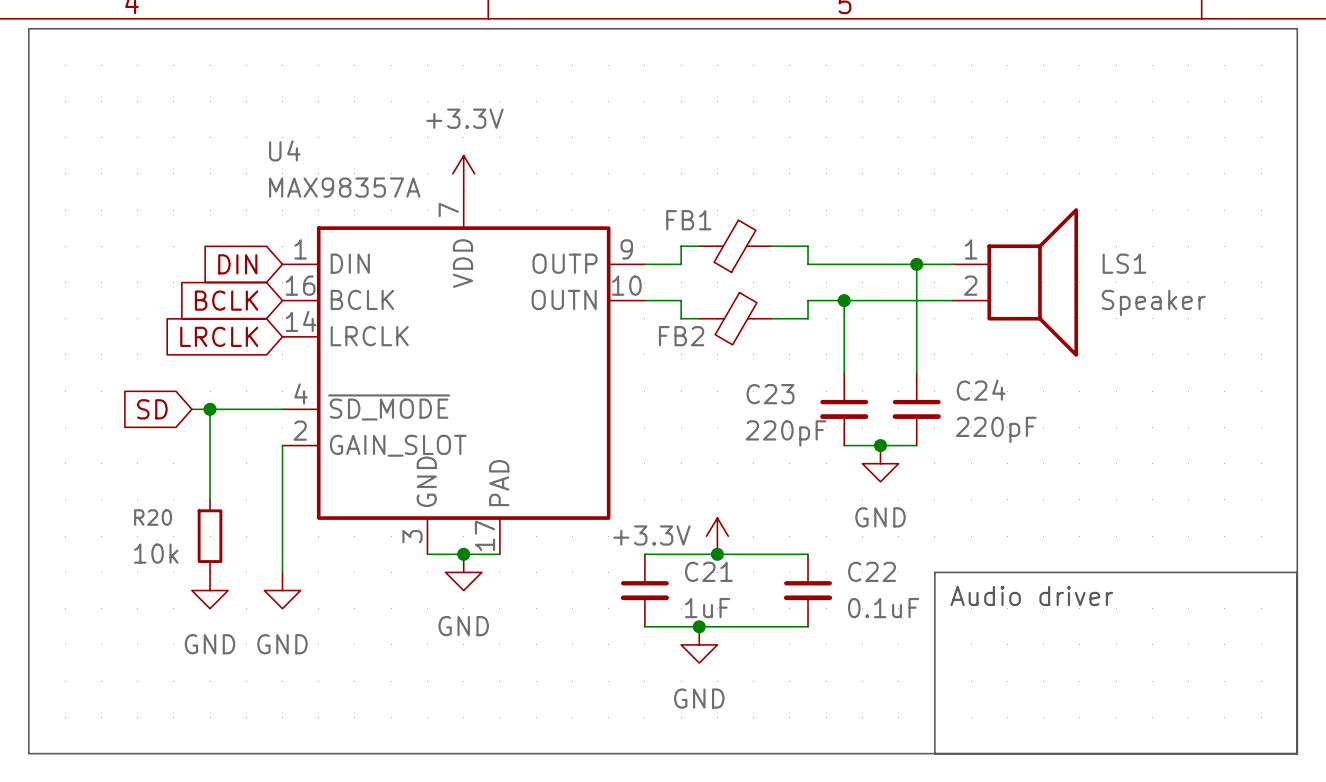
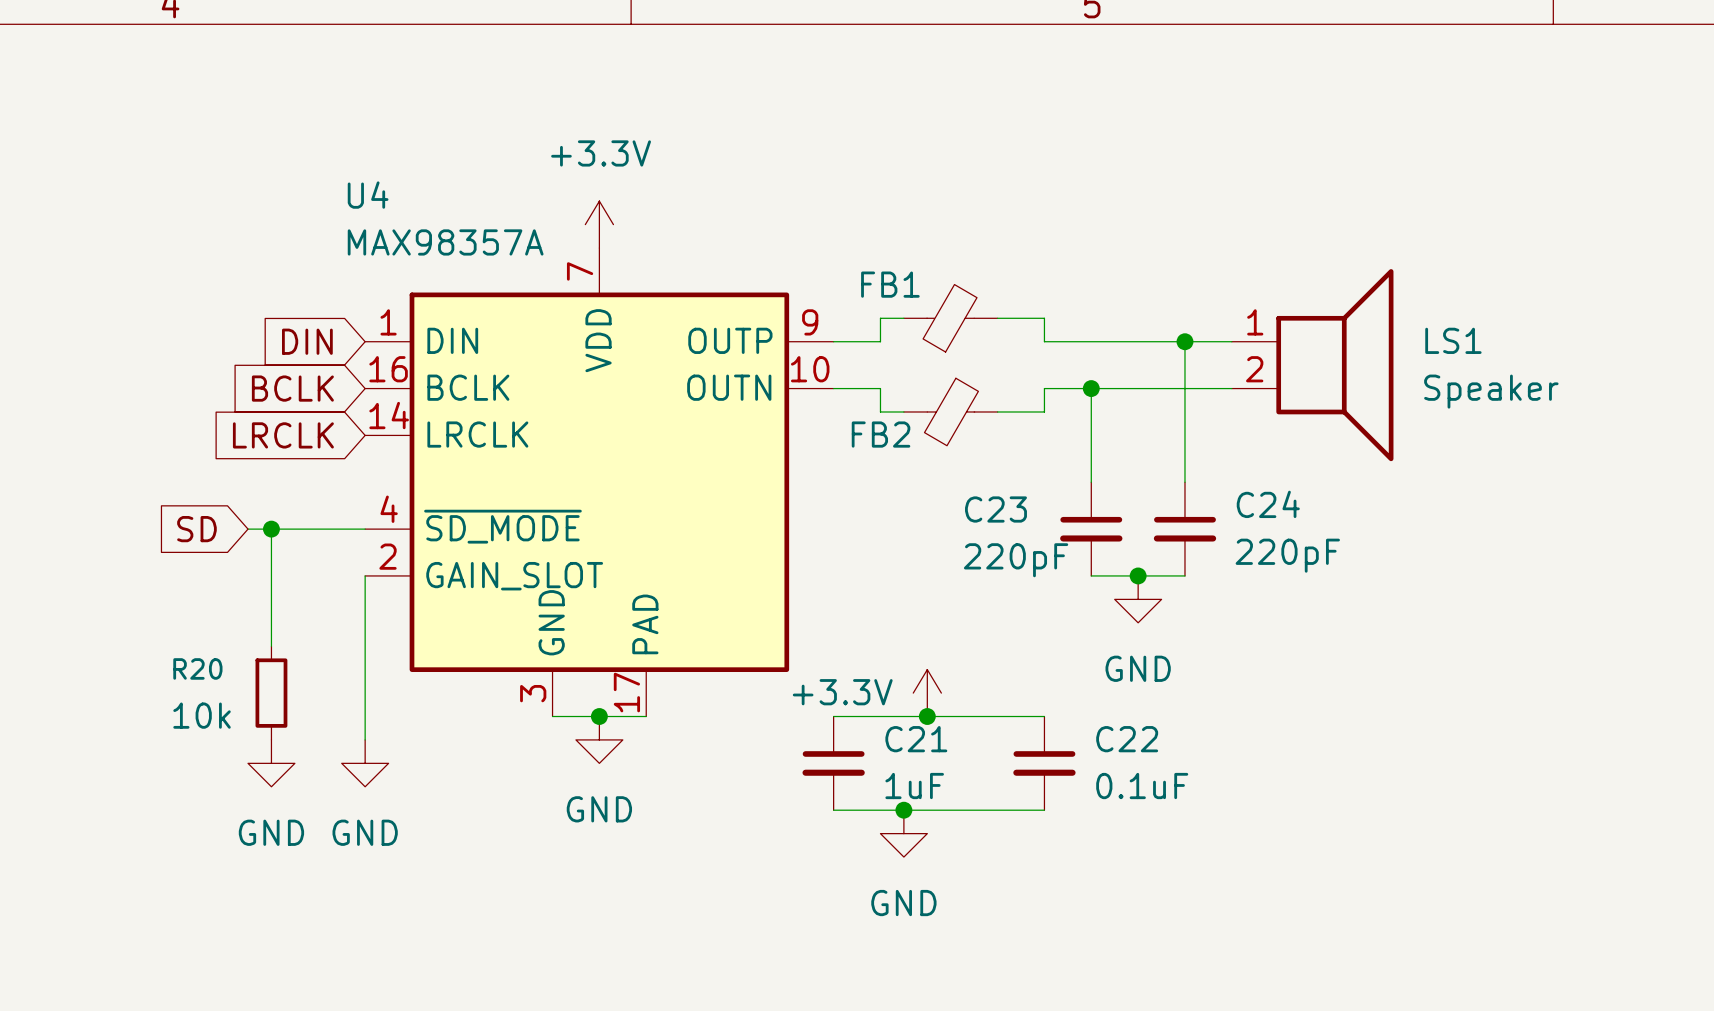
line: (28, 28) (1297, 28) (1297, 753) (28, 753) (28, 28) -> none
line: (1297, 572) (934, 572) (934, 753) -> none
text: Audio driver (1031, 595) -> none

